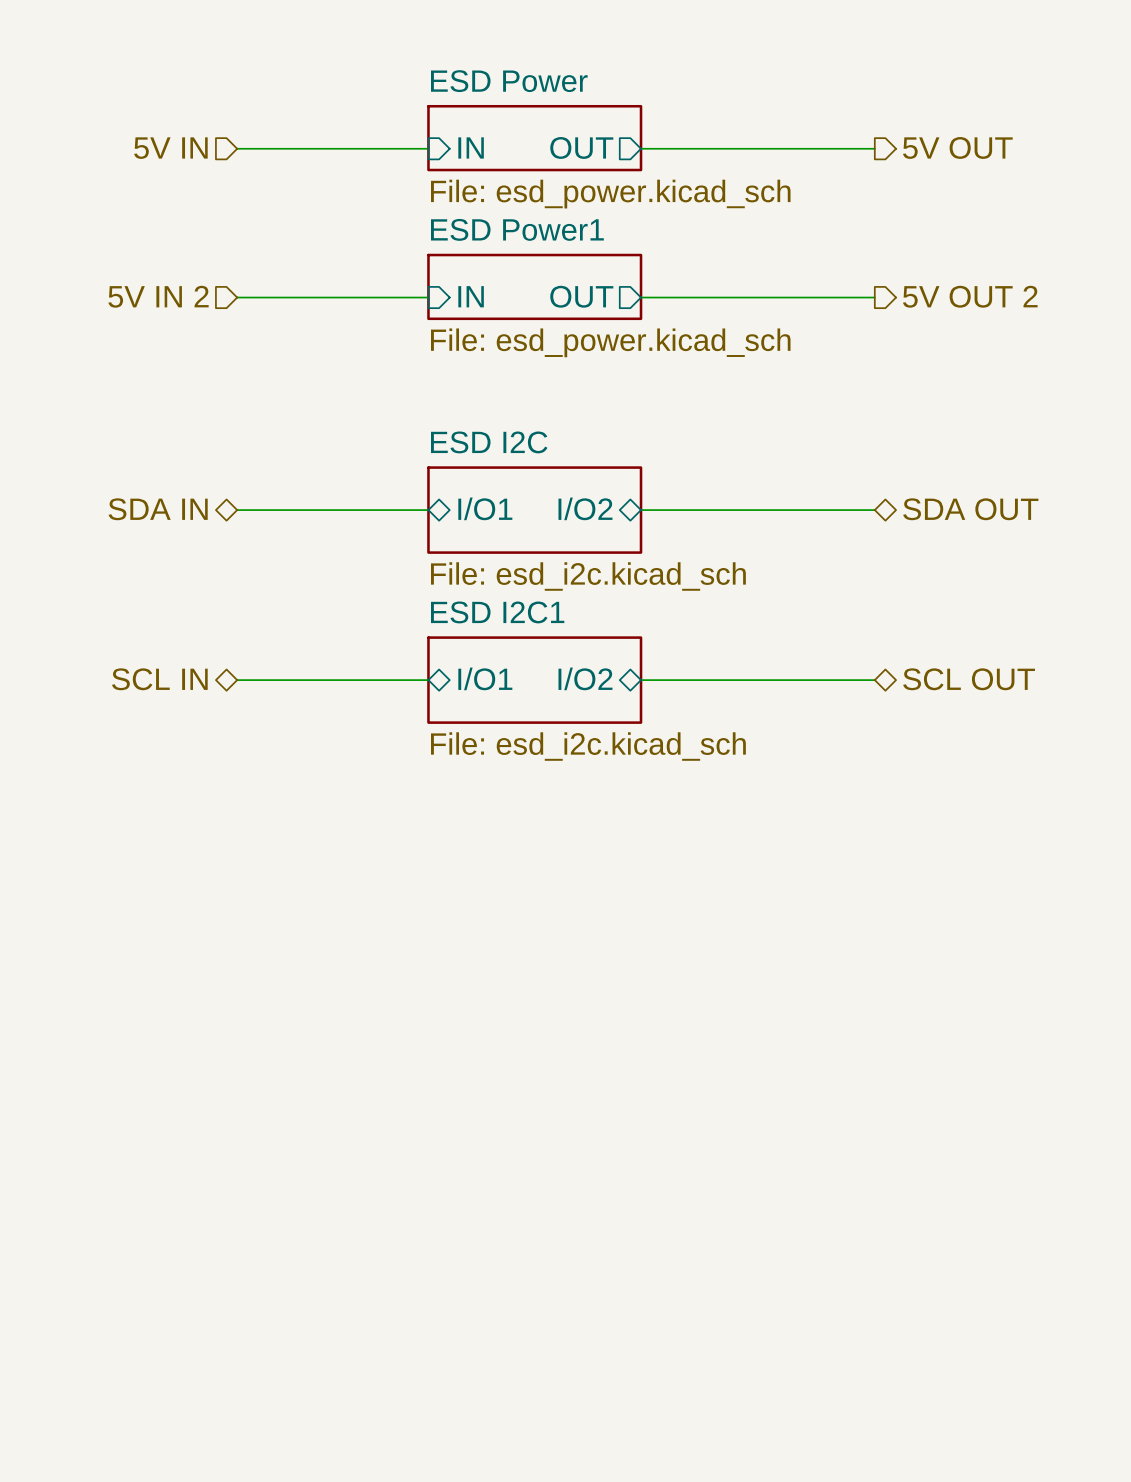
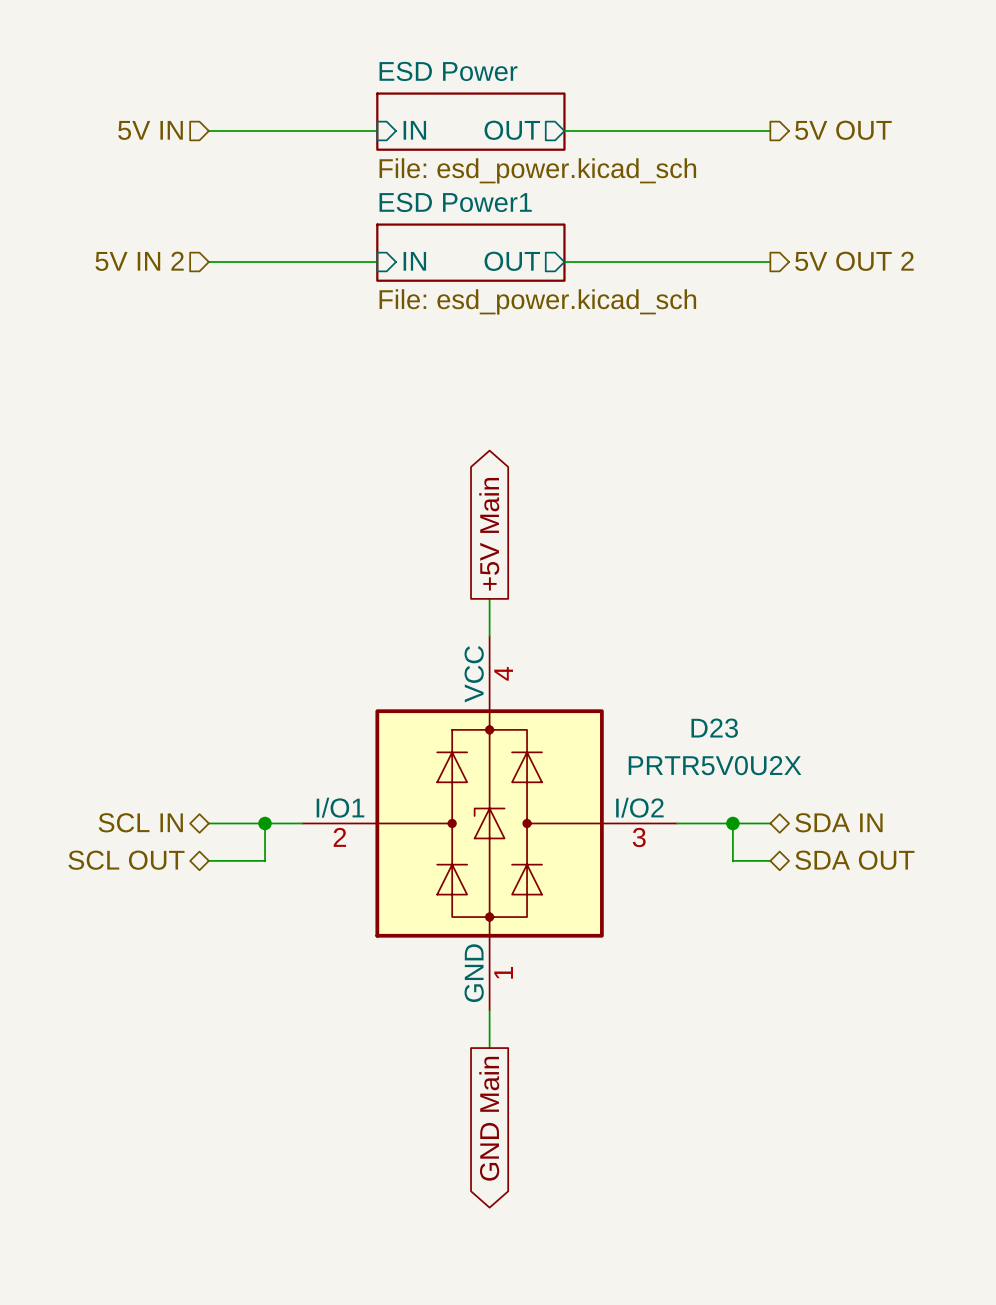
sheet pin: I/O1 (485, 508) -> none
sheet pin: I/O2 (585, 508) -> none
hierarchical label: SDA IN (158, 509) -> none
hierarchical label: SDA OUT (970, 509) -> none
wire: (237, 510) (428, 510) -> none
sheet ESD I2C: File: esd_i2c.kicad_sch (534, 510) -> none
wire: (641, 510) (874, 510) -> none
global label: none -> +5V Main (489, 534)
sheet pin: I/O1 (485, 678) -> none
sheet pin: I/O2 (585, 678) -> none
hierarchical label position: SCL IN (159, 679) -> SCL IN (140, 822)
hierarchical label: SCL OUT (969, 679) -> none
wire: (237, 680) (428, 680) -> none
sheet ESD I2C1: File: esd_i2c.kicad_sch (534, 680) -> none
wire: none -> (489, 598) (489, 636)
wire: (641, 680) (874, 680) -> none
hierarchical label: none -> SDA IN (838, 822)
wire: none -> (208, 823) (302, 823)
wire: none -> (265, 823) (265, 860) (208, 860)
junction: none -> (265, 823)
D23: none -> PRTR5V0U2X (489, 823)
wire: none -> (676, 823) (770, 823)
wire: none -> (732, 823) (732, 860) (770, 860)
junction: none -> (732, 823)
hierarchical label: none -> SCL OUT (126, 860)
hierarchical label: none -> SDA OUT (854, 860)
wire: none -> (489, 1010) (489, 1048)
global label: none -> GND Main (489, 1118)

